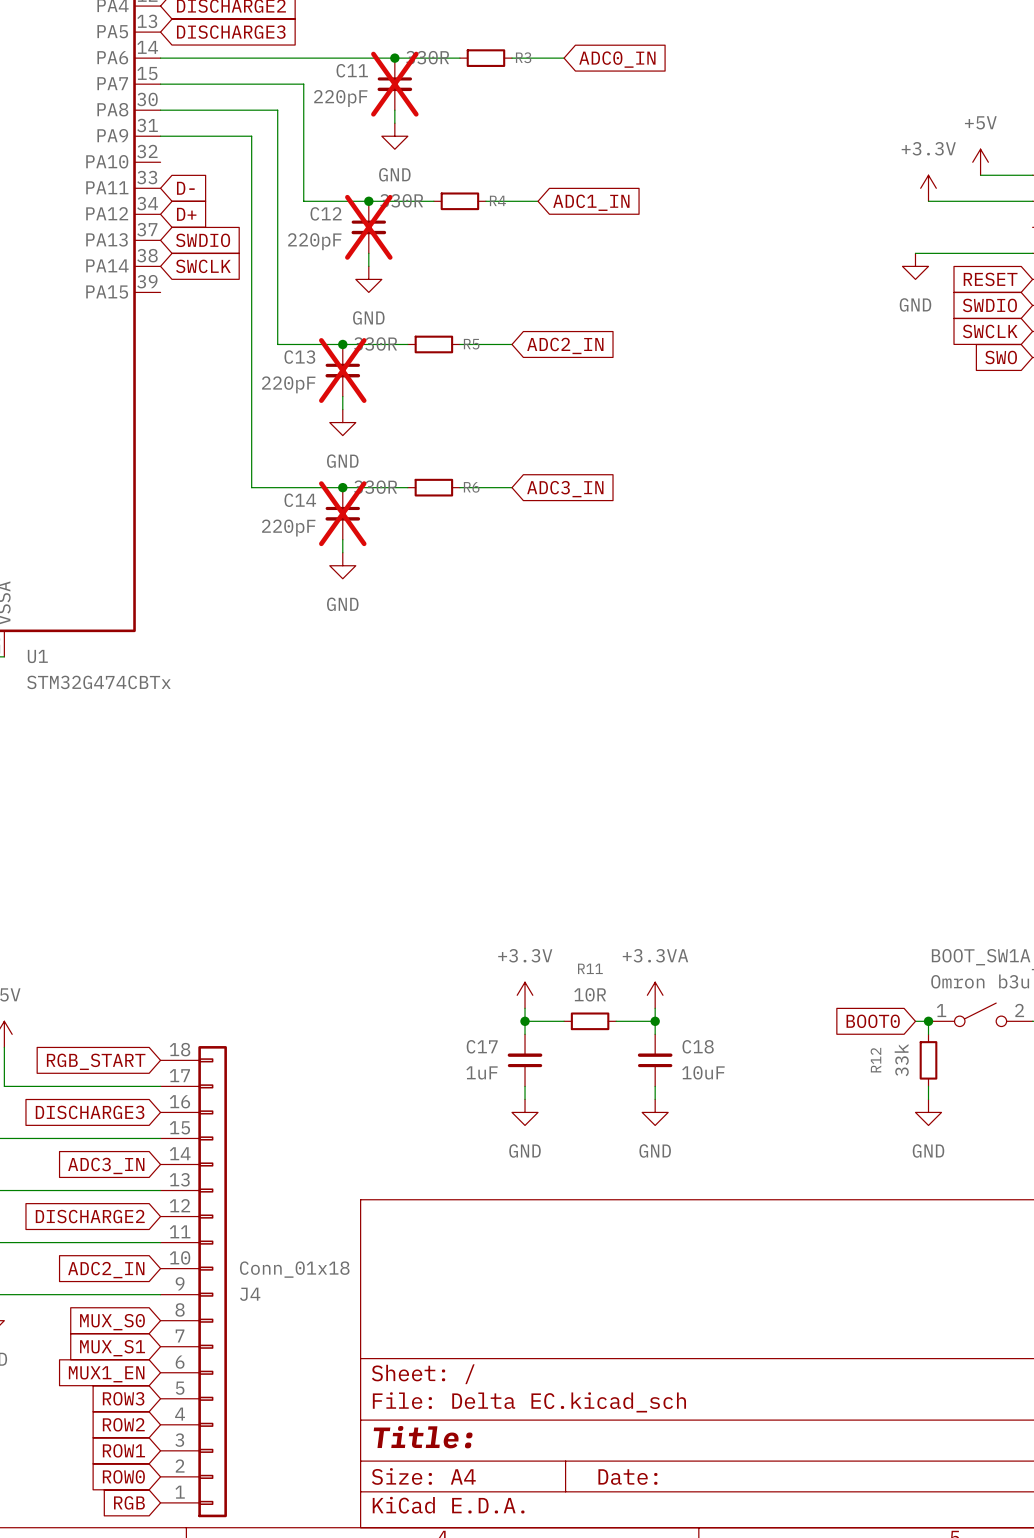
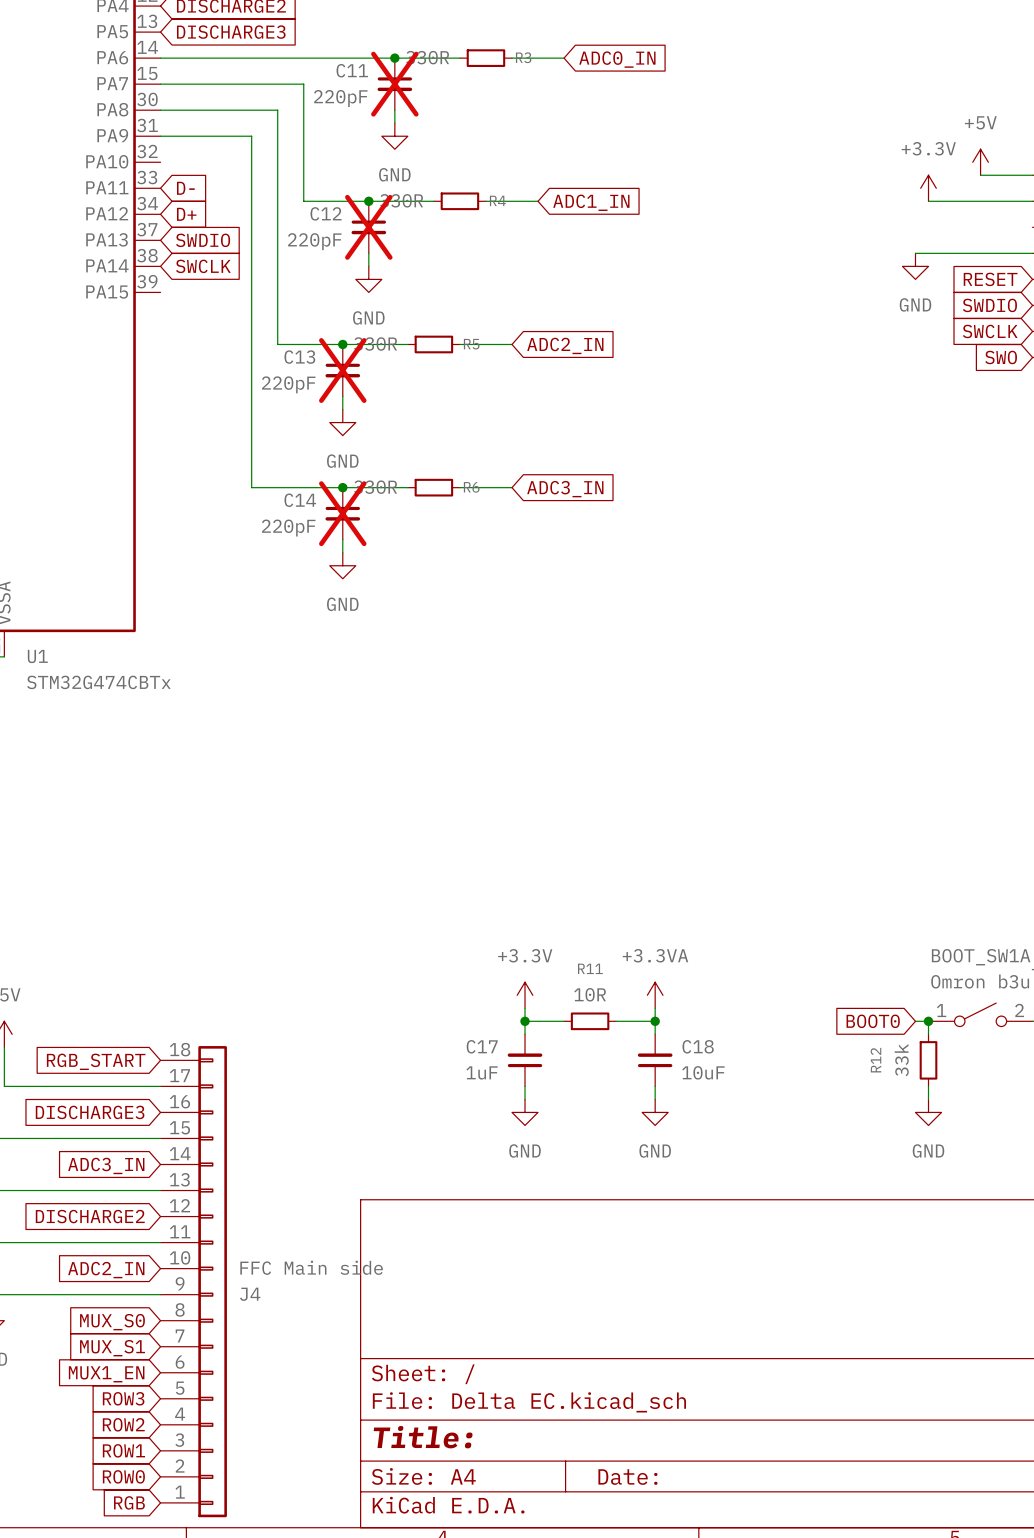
J4 value: Conn_01x18 (294, 1269) -> FFC Main side (311, 1267)

